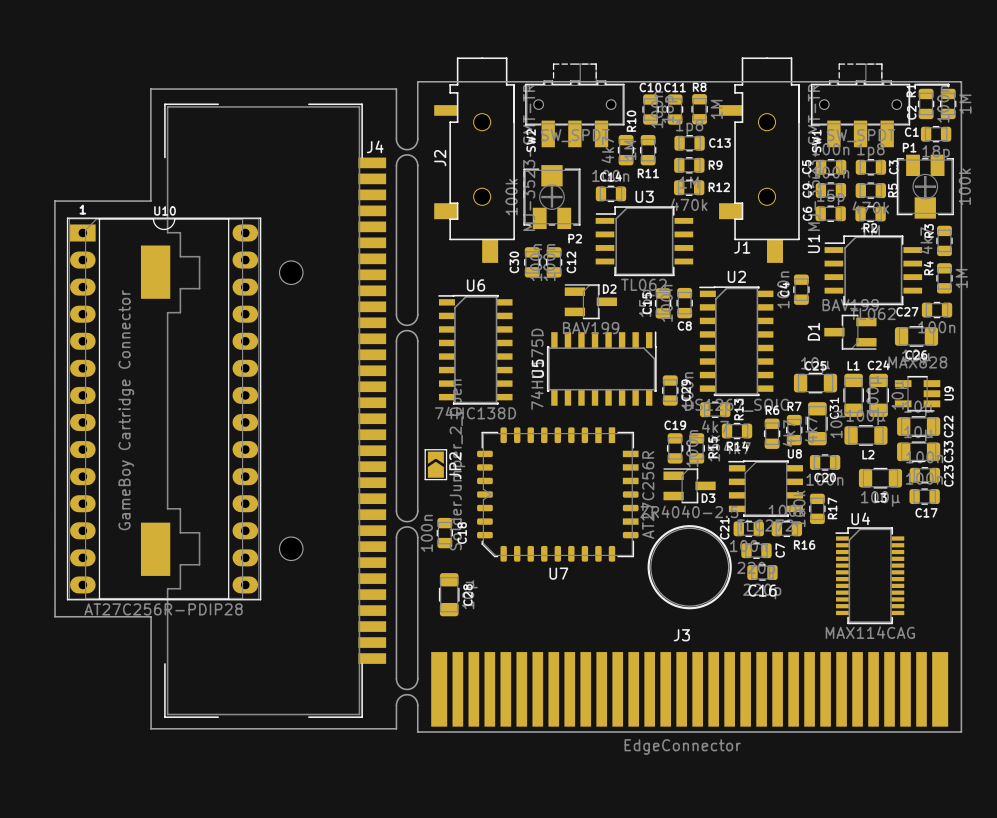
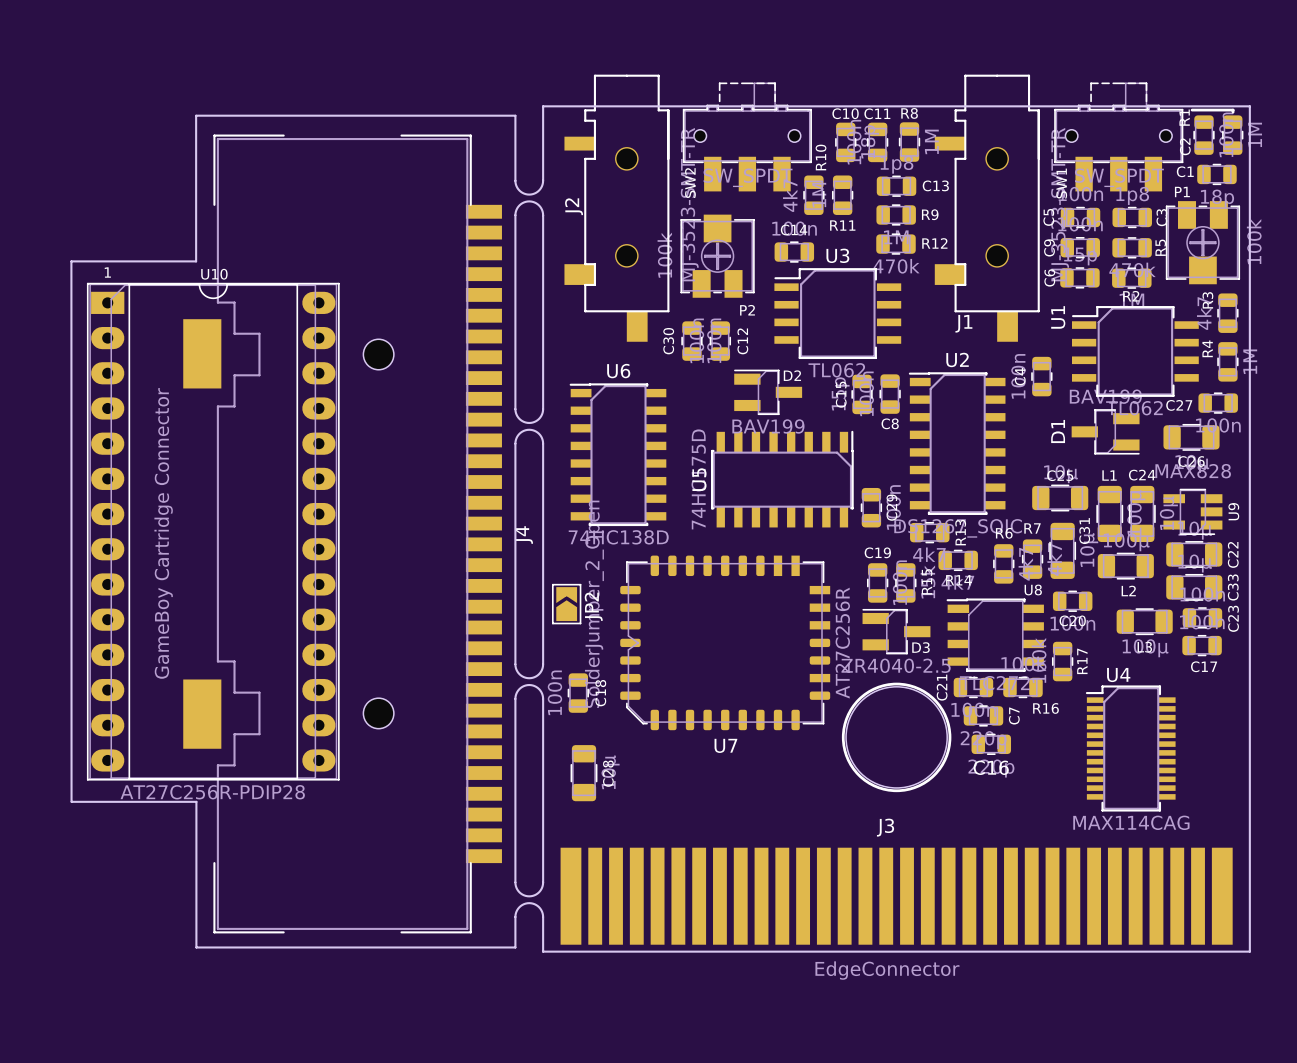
J4 name rotation: 0° (375, 146) -> 90° counterclockwise (524, 534)
J4 name position: J4 (375, 146) -> J4 (524, 534)

